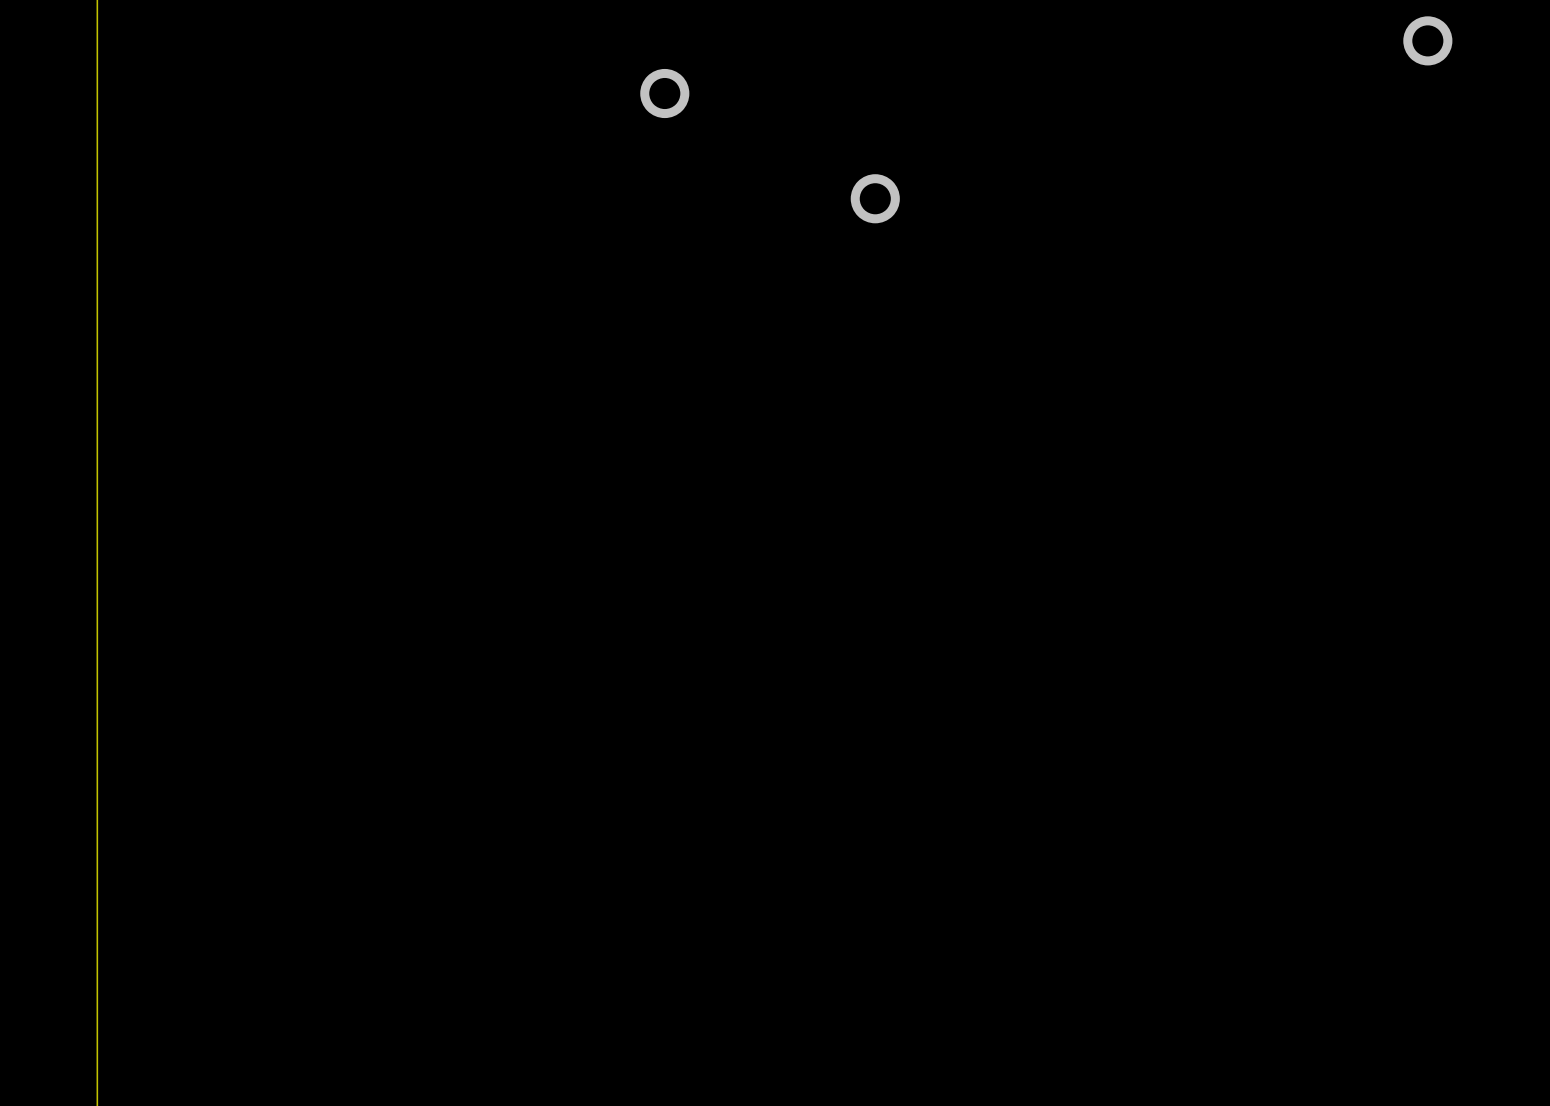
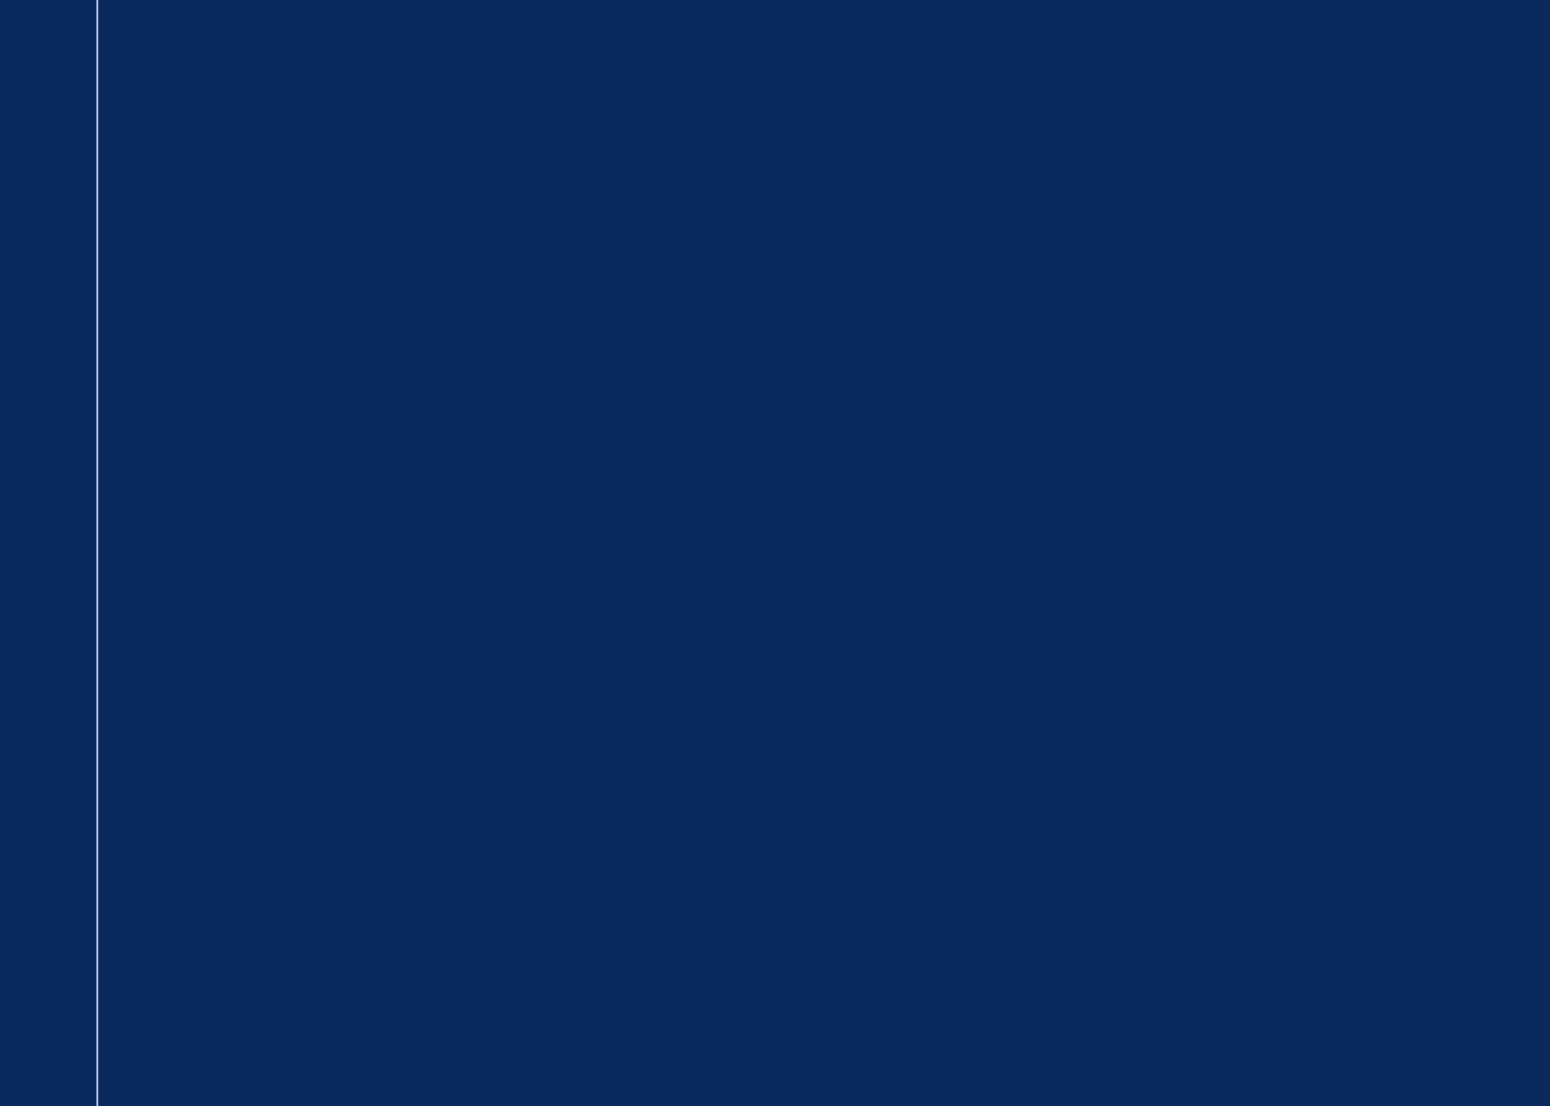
via: (1427, 40) -> none
via: (664, 93) -> none
via: (875, 198) -> none

